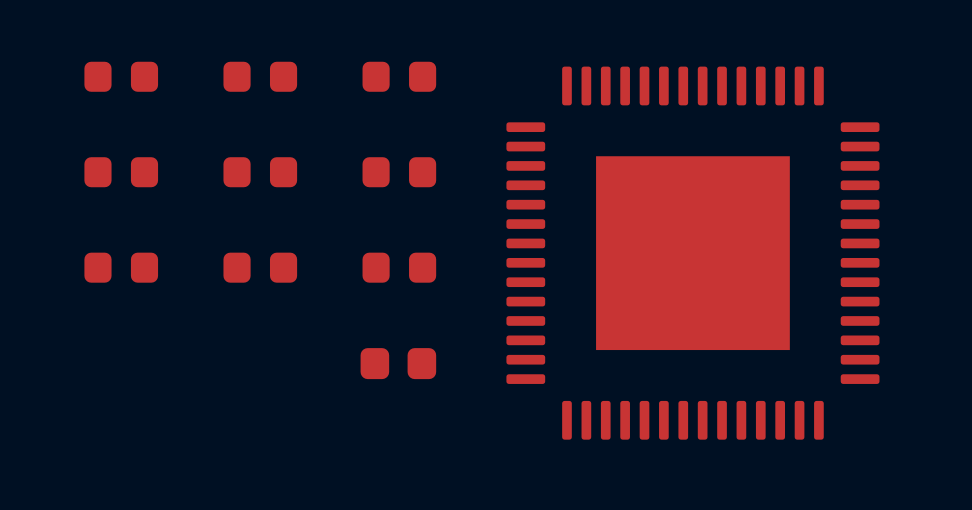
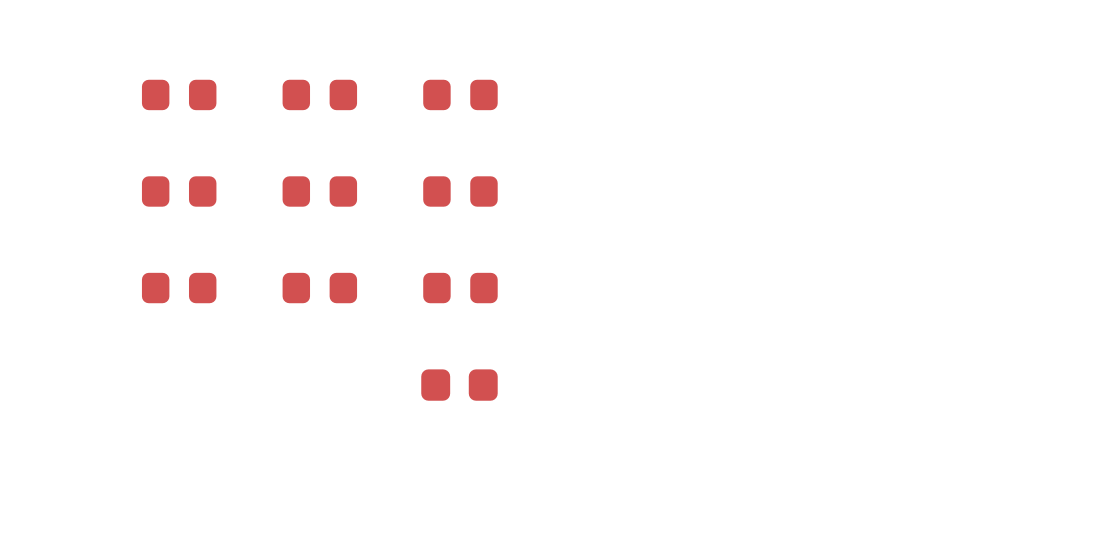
part: (692, 253) -> none

